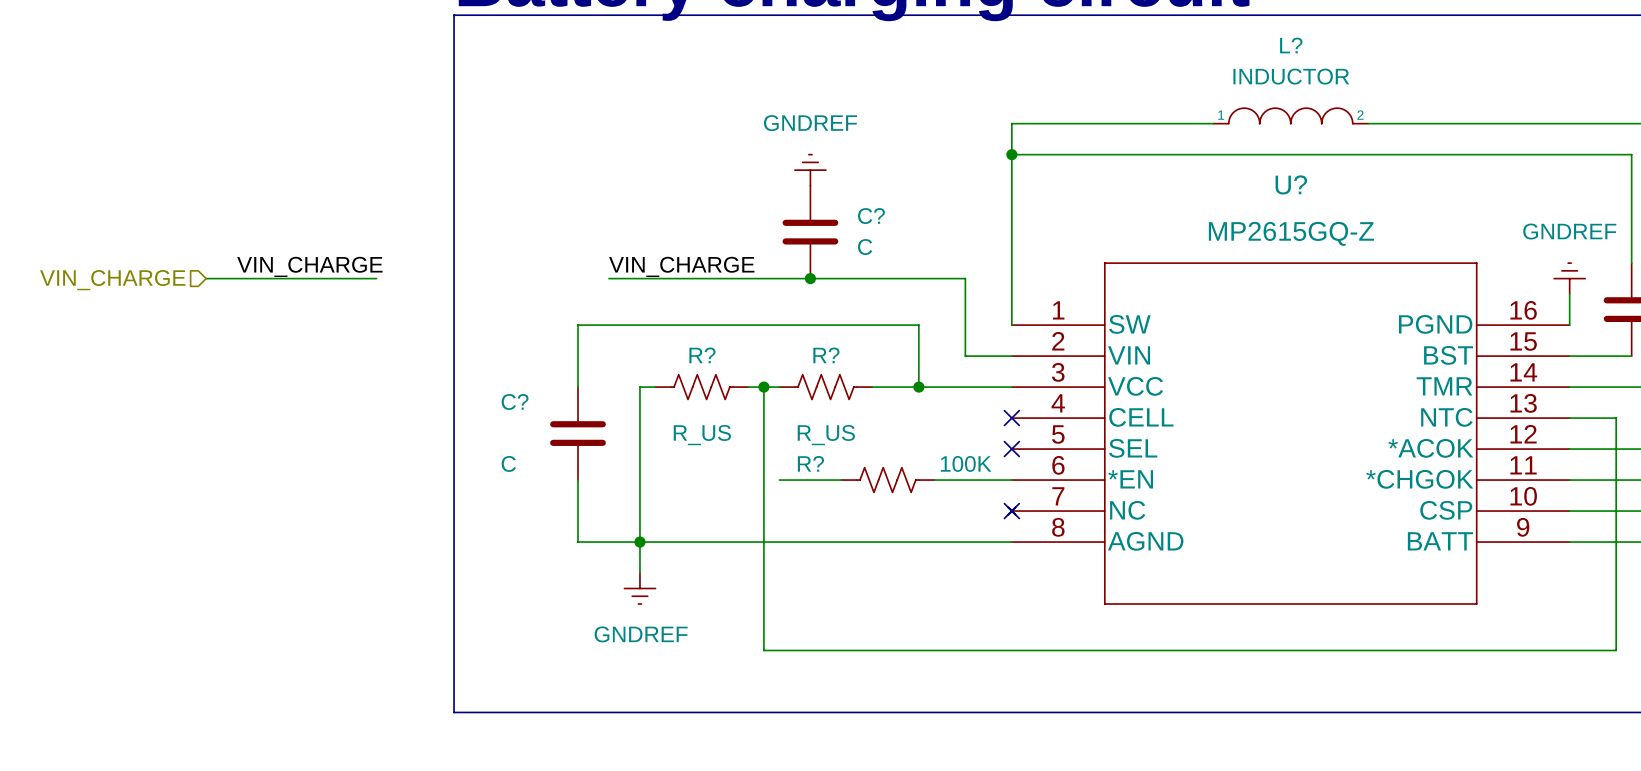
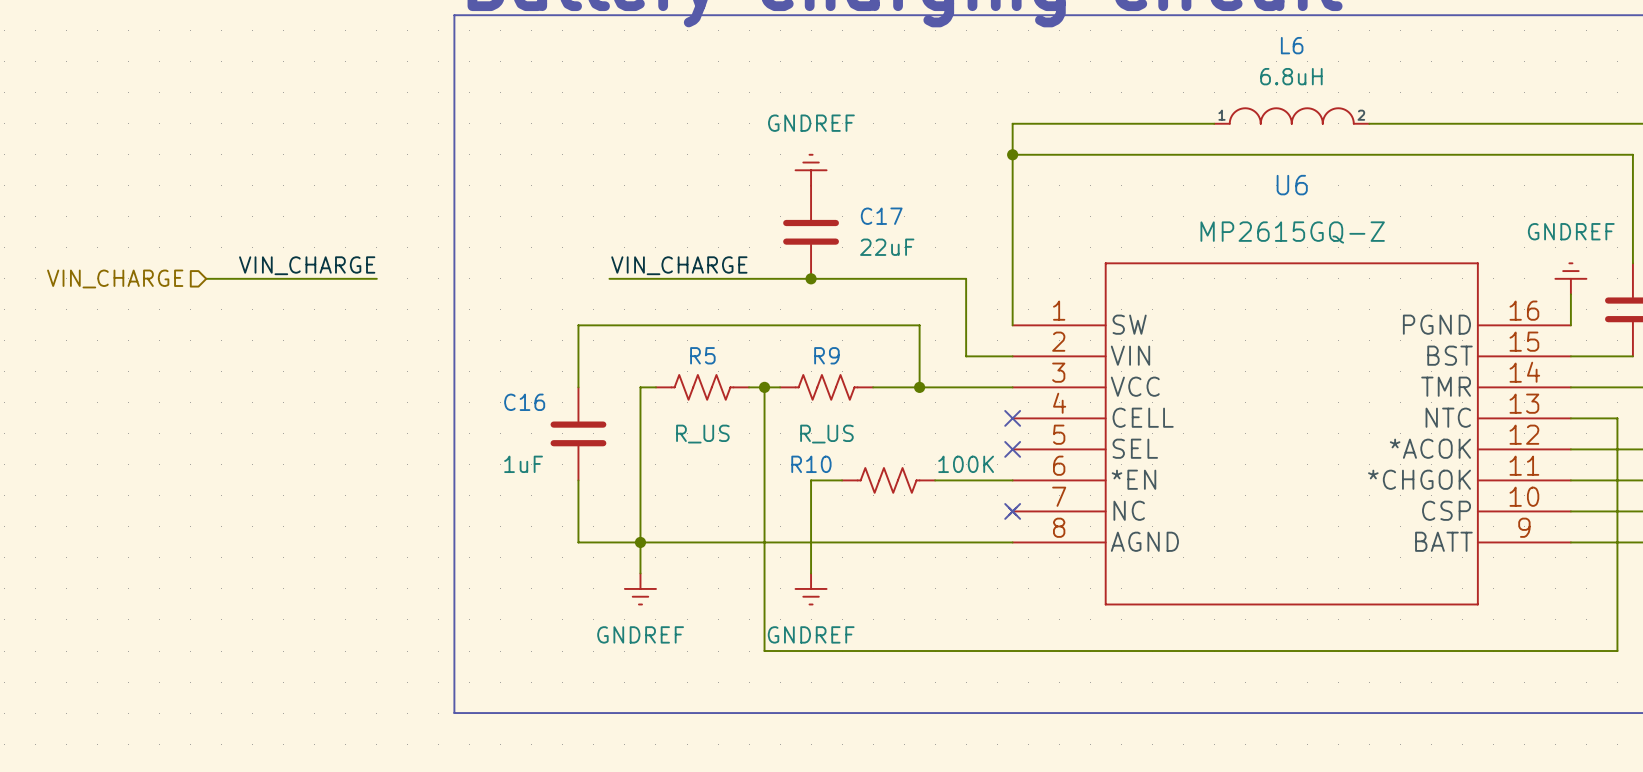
L? name: L? (1291, 45) -> L6 (1292, 45)
L? value: INDUCTOR (1291, 76) -> 6.8uH (1291, 76)
U? name: U? (1291, 184) -> U6 (1292, 185)
C? name: C? (871, 216) -> C17 (881, 216)
C? value: C (865, 247) -> 22uF (887, 247)
R? name: R? (702, 355) -> R5 (702, 355)
R? name: R? (826, 355) -> R9 (826, 355)
C? name: C? (515, 401) -> C16 (524, 402)
C? value: C (508, 463) -> 1uF (523, 464)
R? name: R? (810, 463) -> R10 (811, 464)
wire: (779, 480) (810, 480) -> (811, 573) (811, 480)
power symbol: none -> GNDREF (811, 588)

